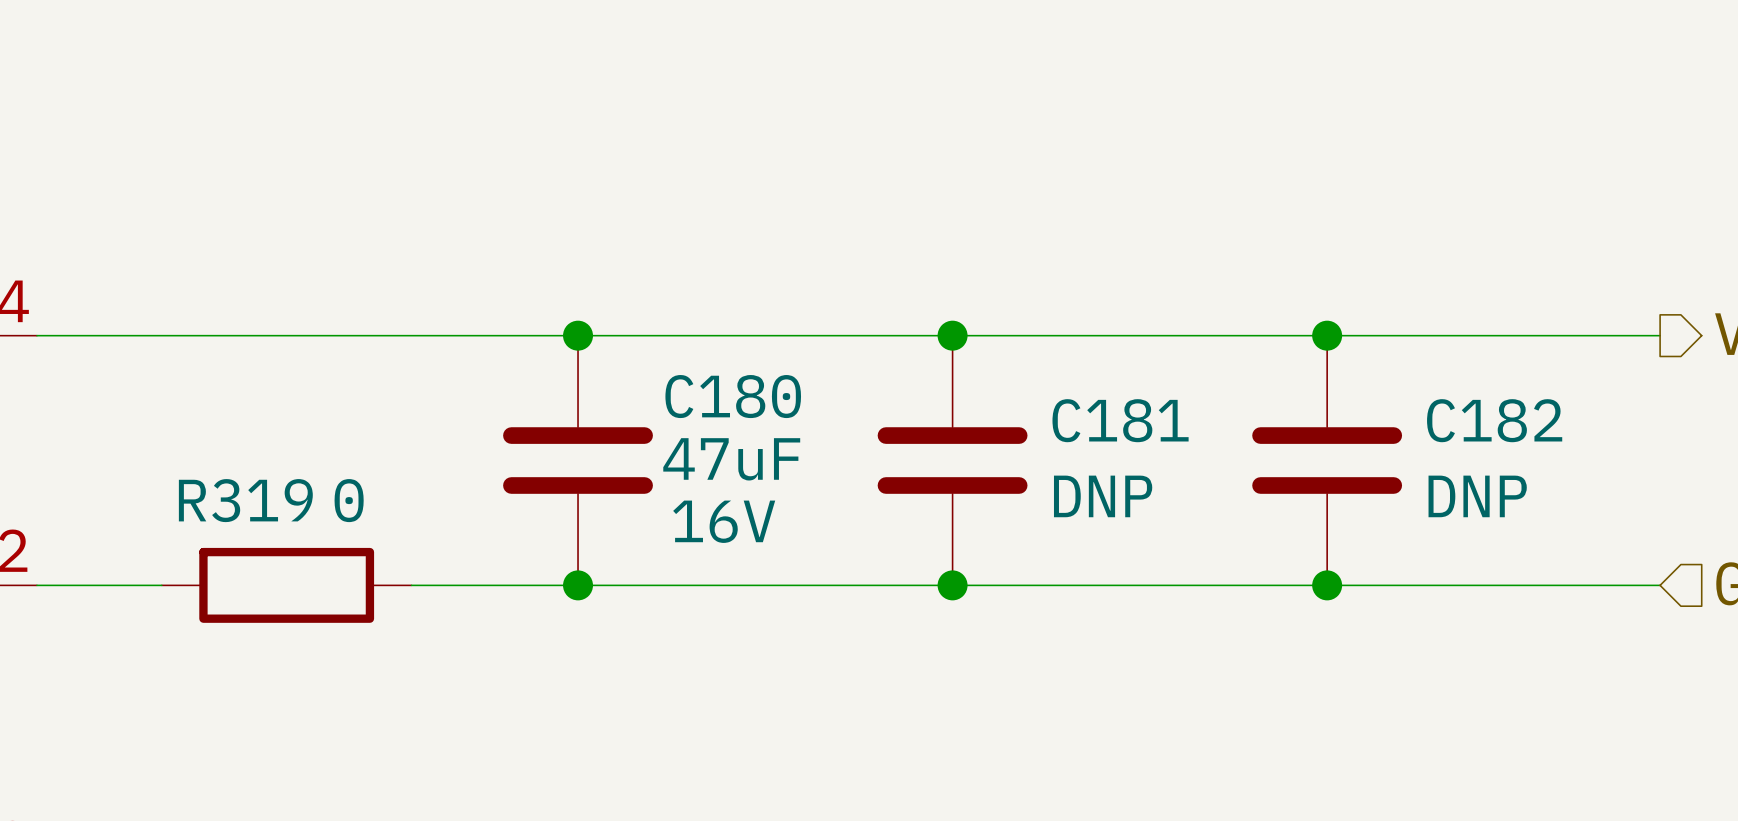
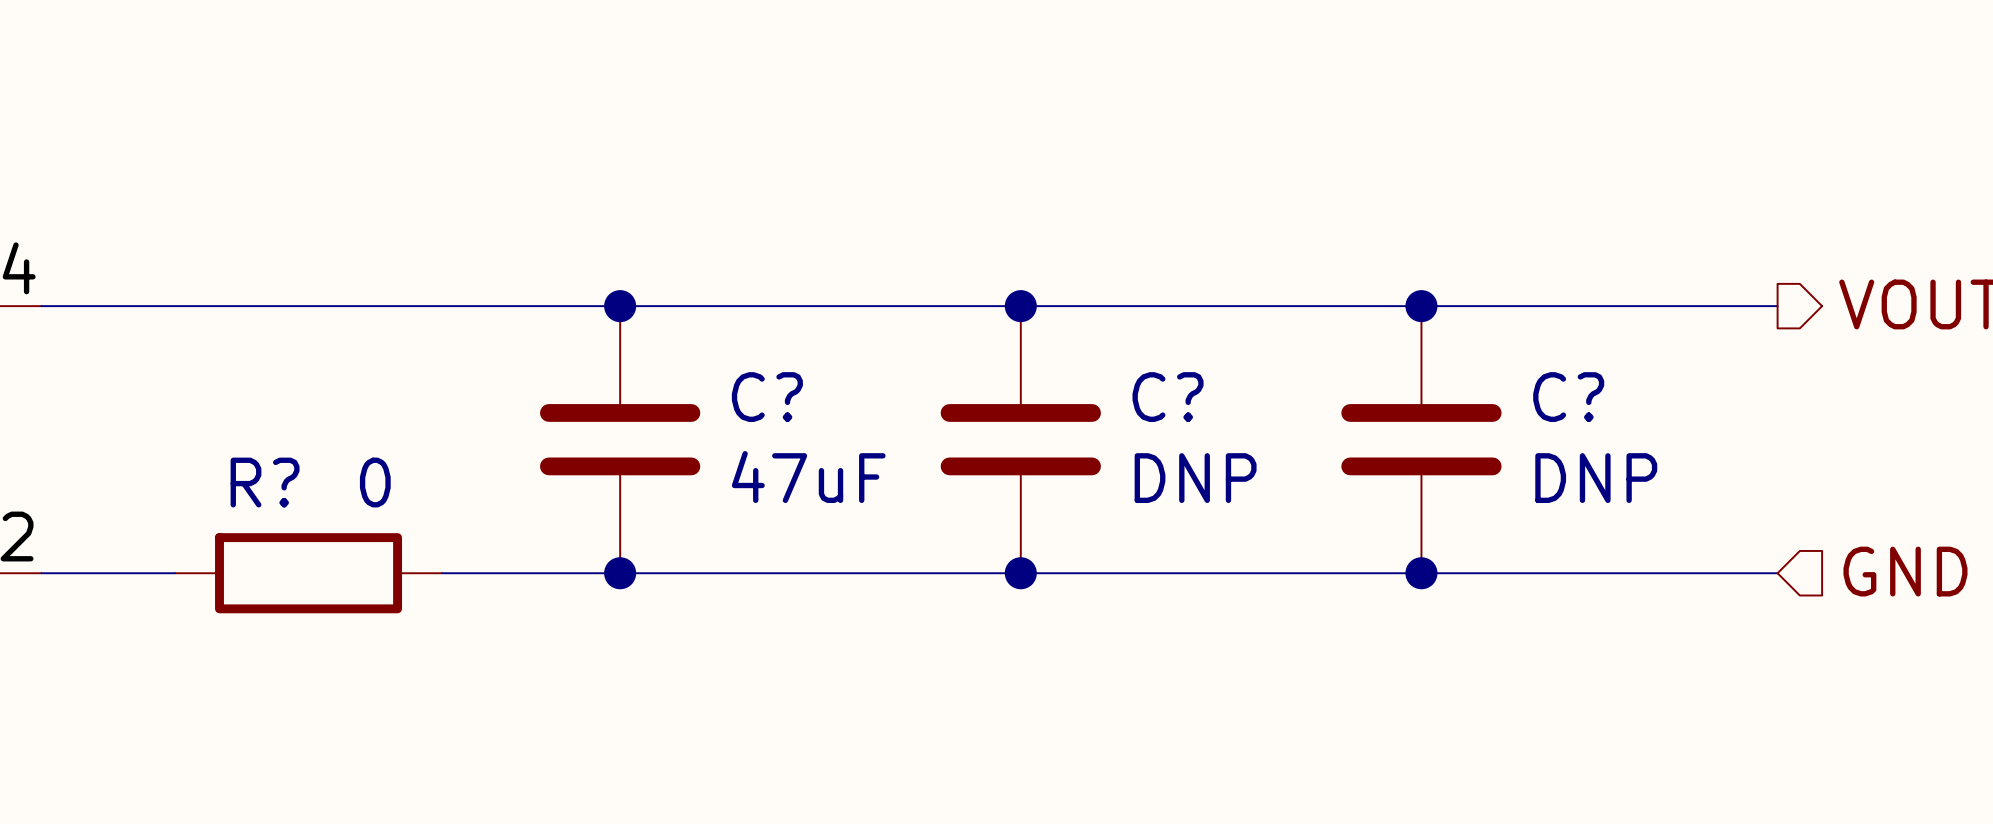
C180 name: C180 (733, 396) -> C? (767, 397)
C181 name: C181 (1120, 420) -> C? (1168, 397)
C182 name: C182 (1494, 420) -> C? (1568, 397)
C180 value position: 47uF (731, 459) -> 47uF (808, 477)
R319 name: R319 (245, 500) -> R? (265, 482)
C180 text: 16V (724, 521) -> none

